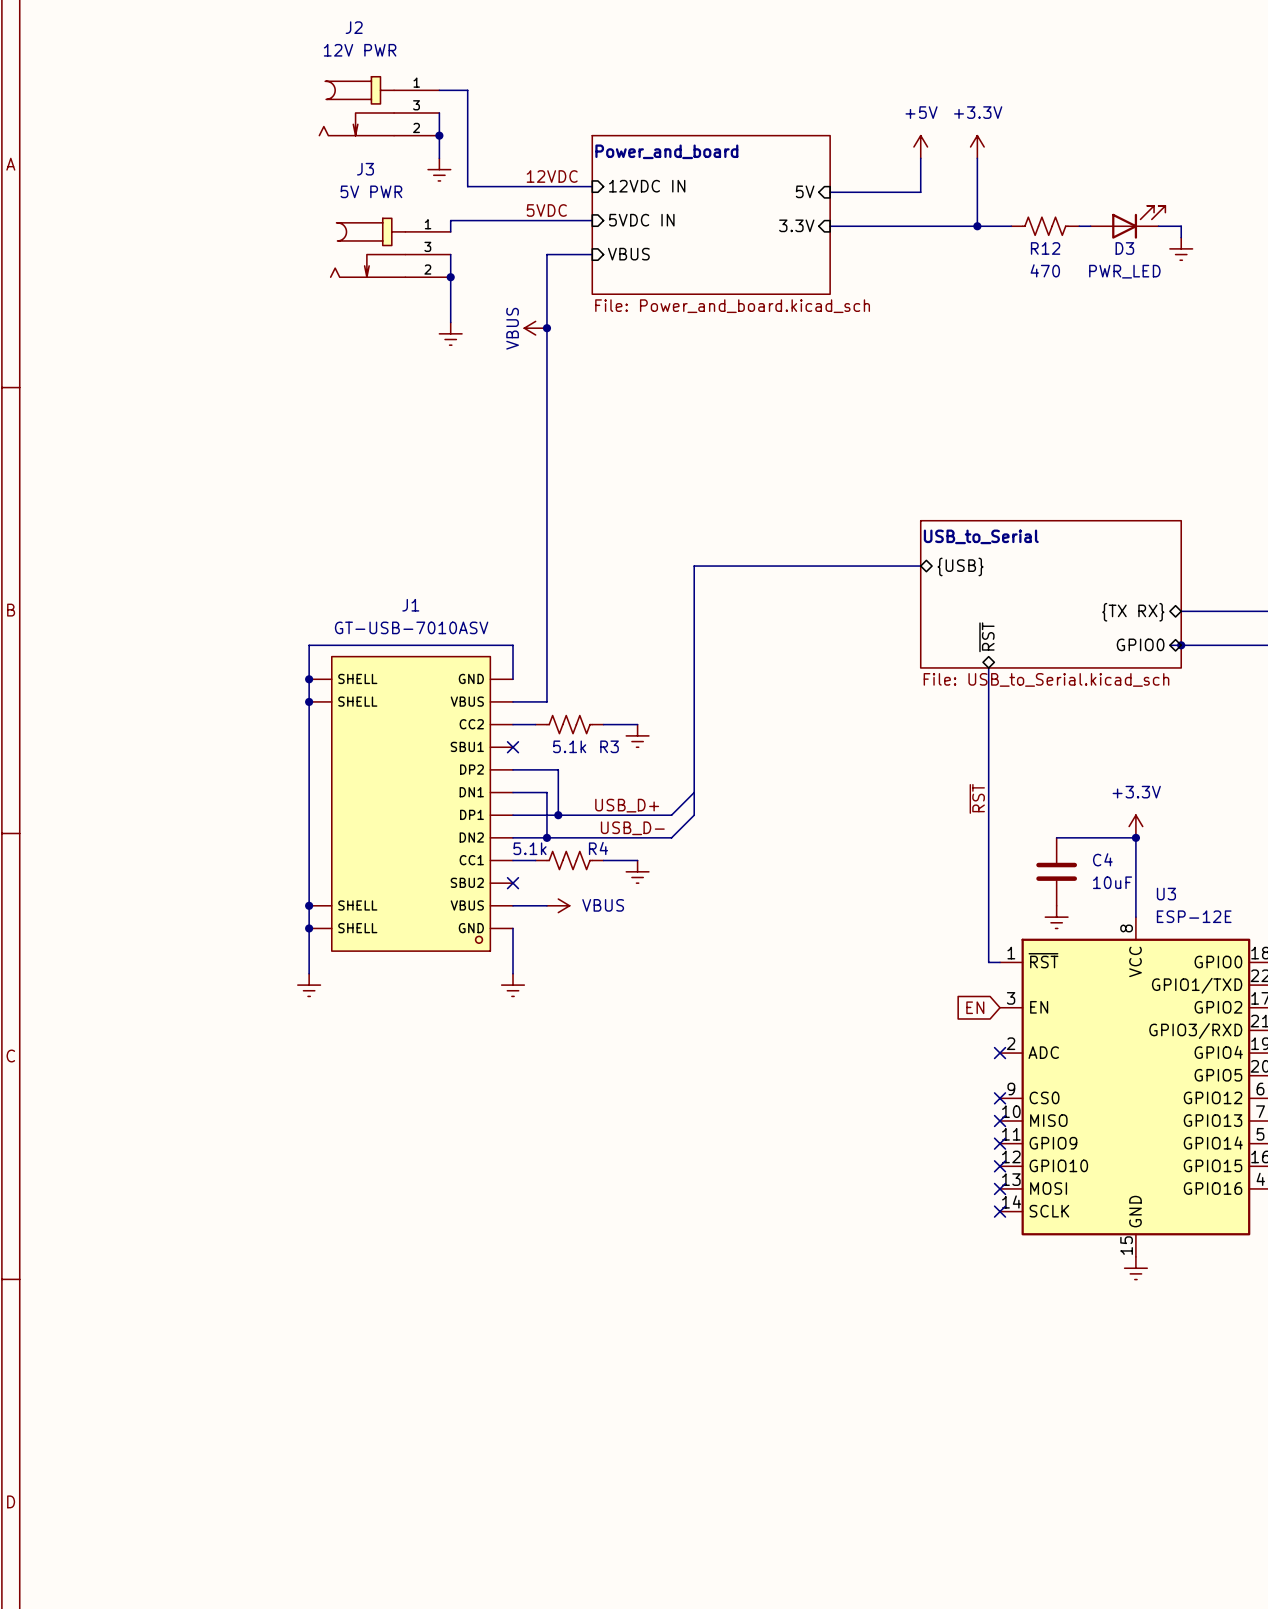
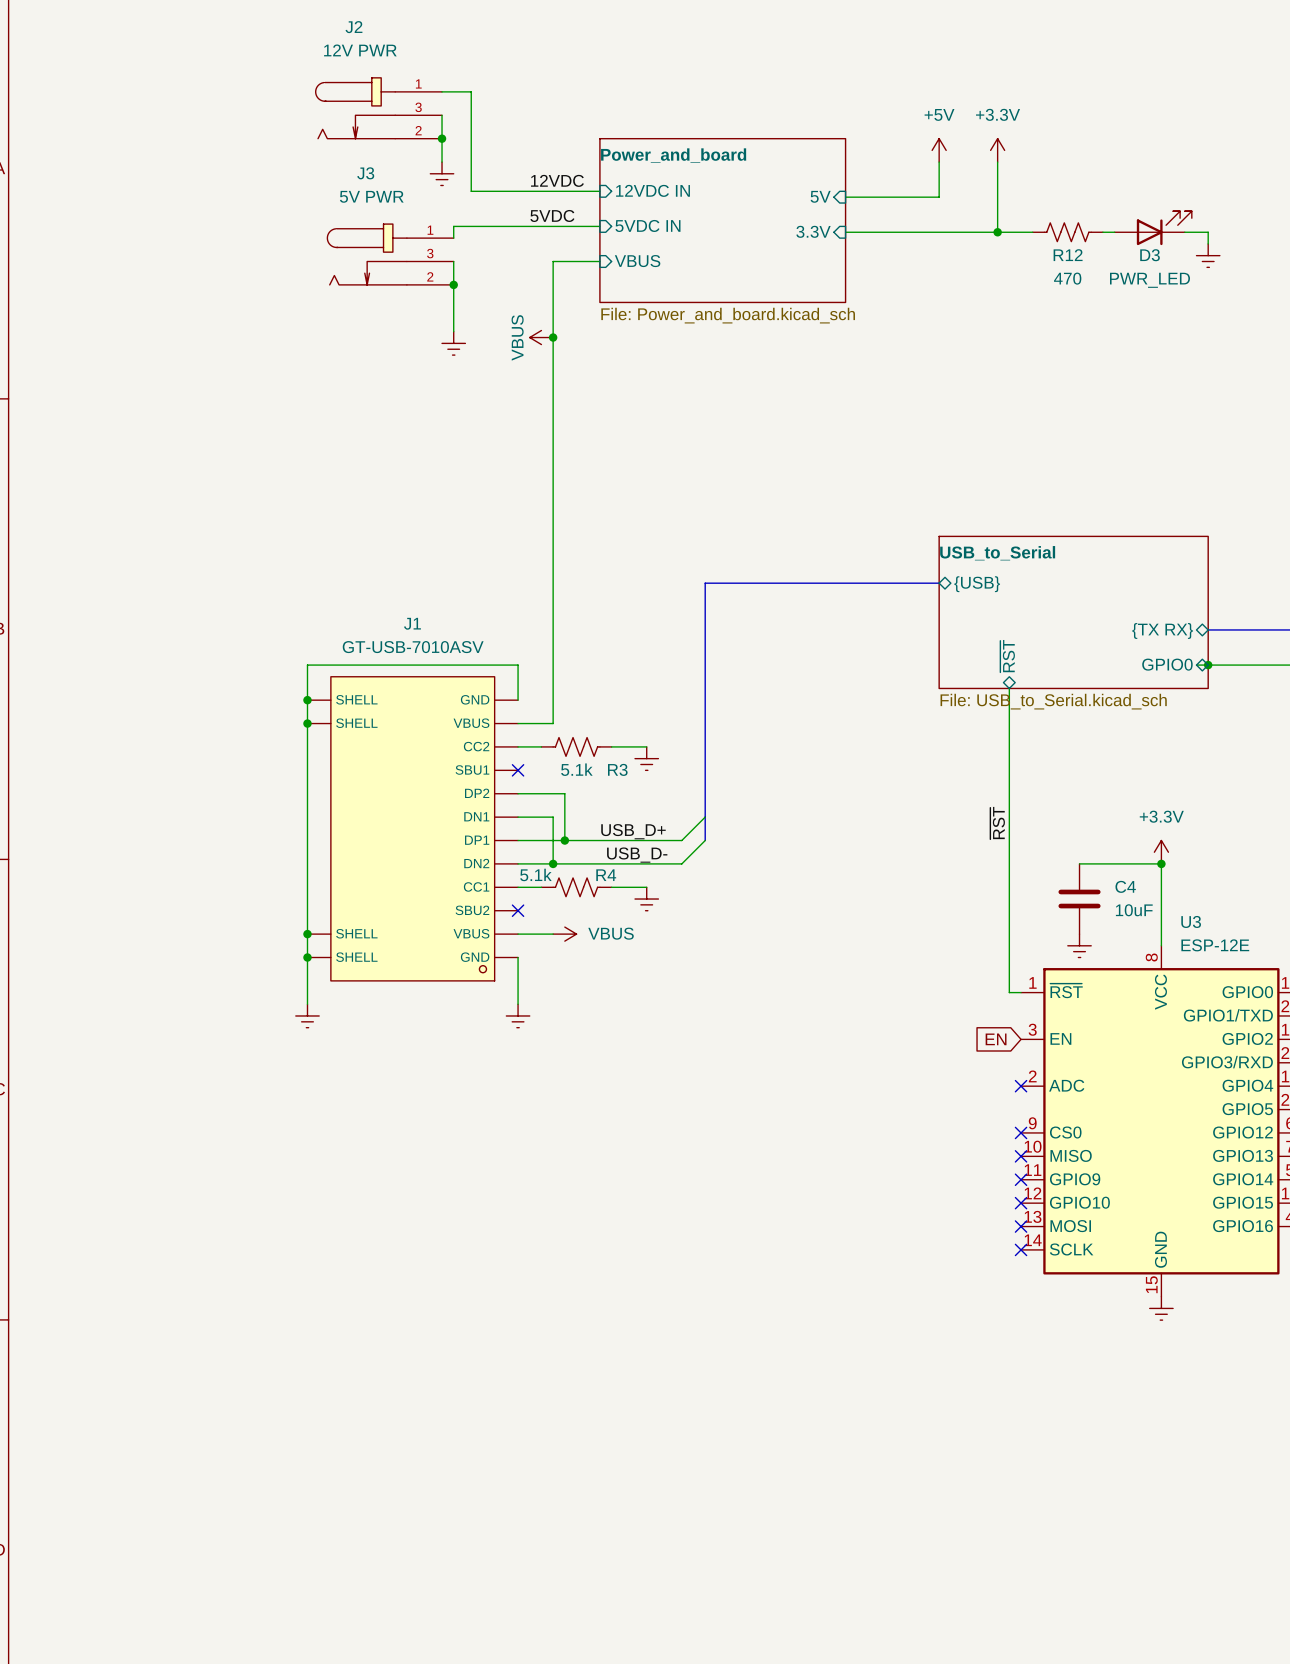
J2 symbol: [319, 76, 440, 136] -> [315, 77, 443, 139]
J3 symbol: [330, 218, 451, 278] -> [327, 224, 454, 285]

